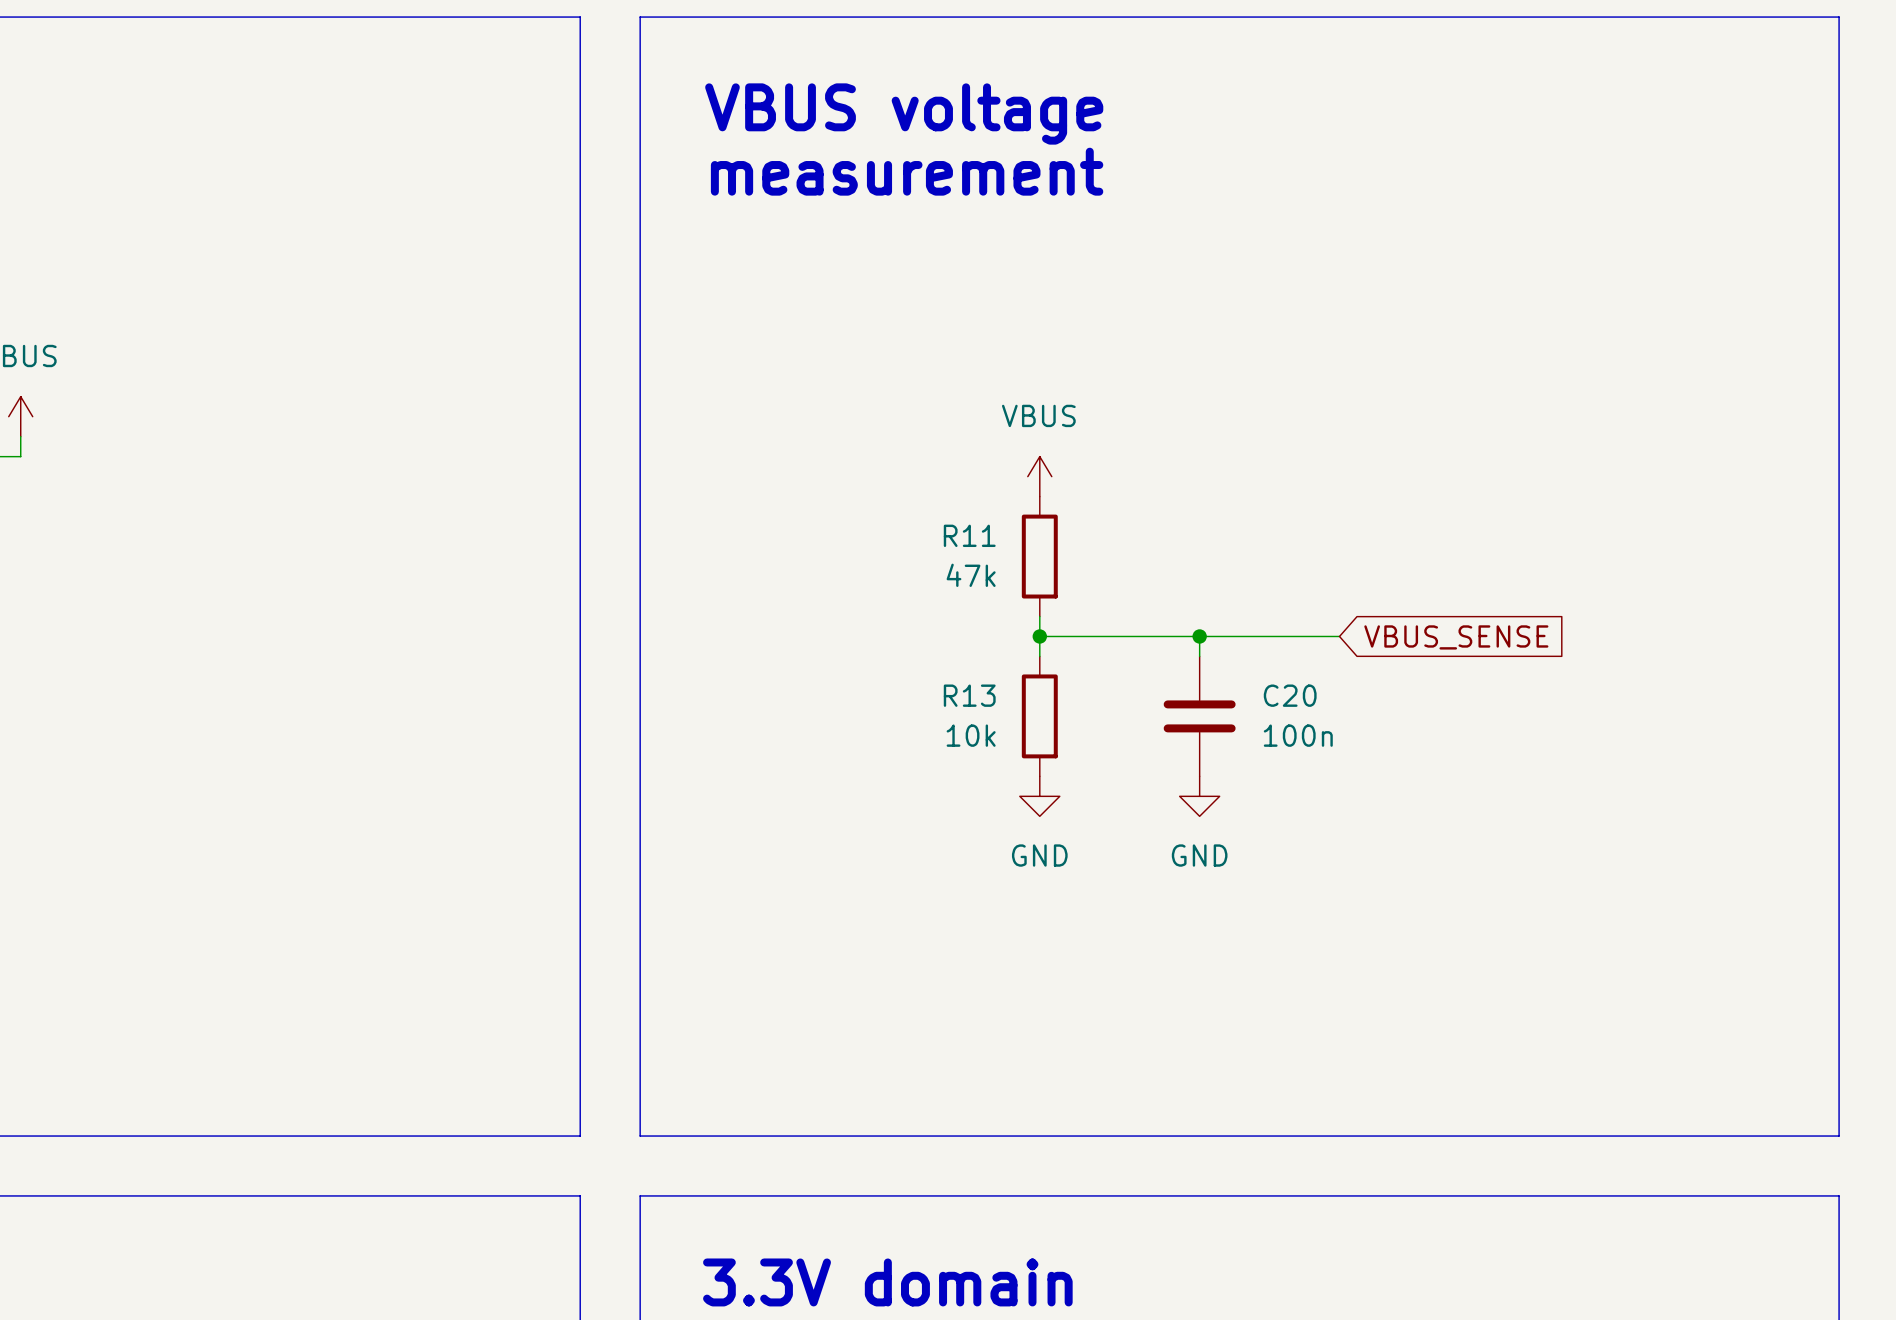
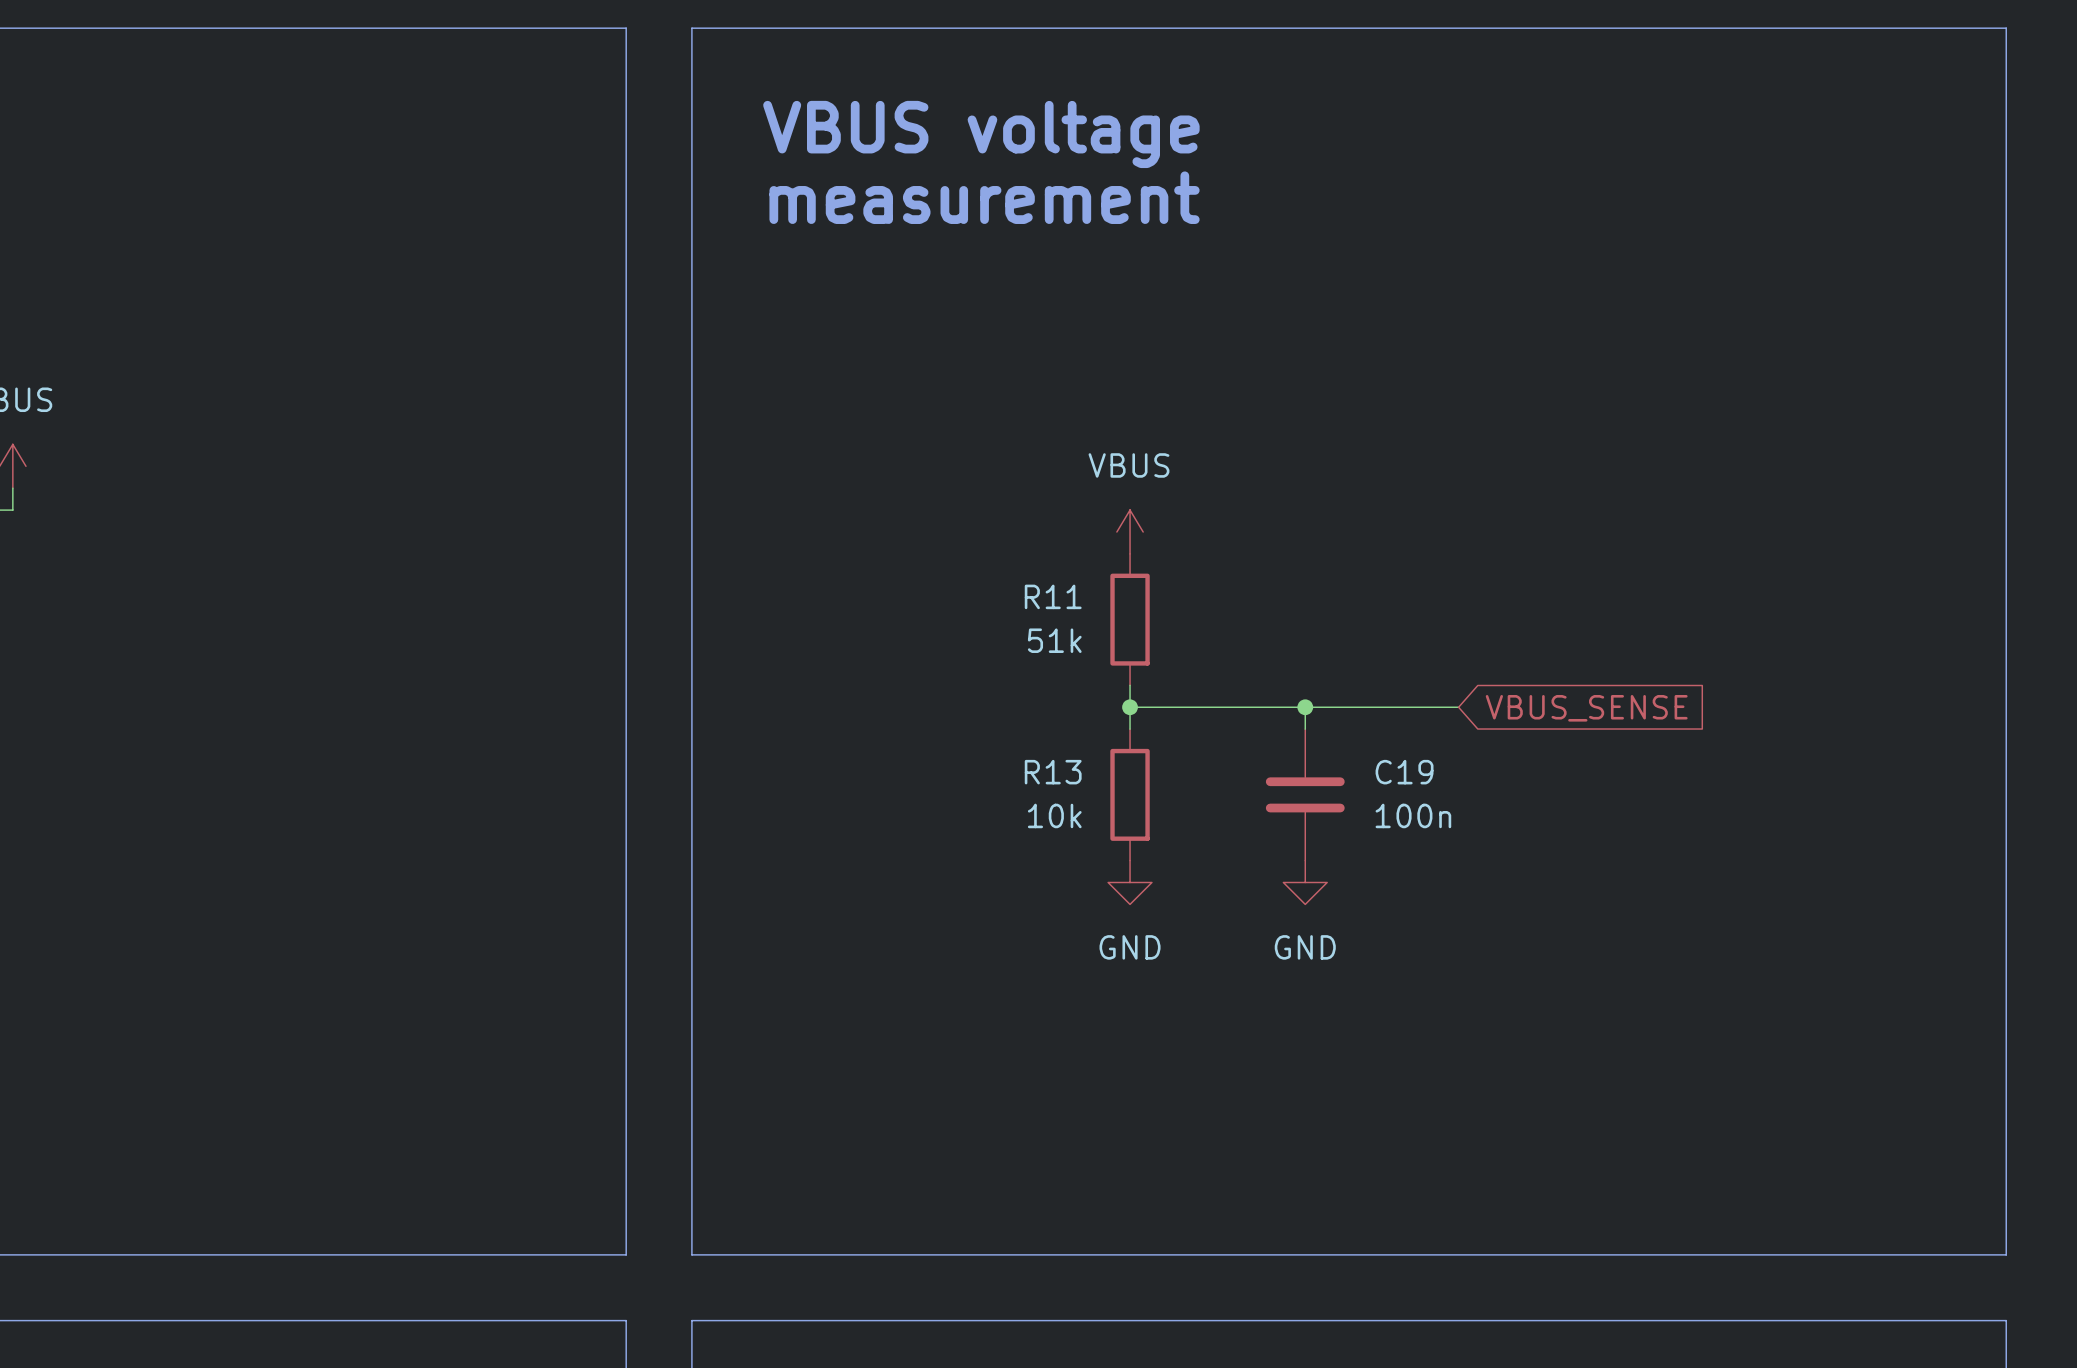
R11 value: 47k (971, 575) -> 51k (1054, 640)
C20 name: C20 (1290, 695) -> C19 (1404, 772)

